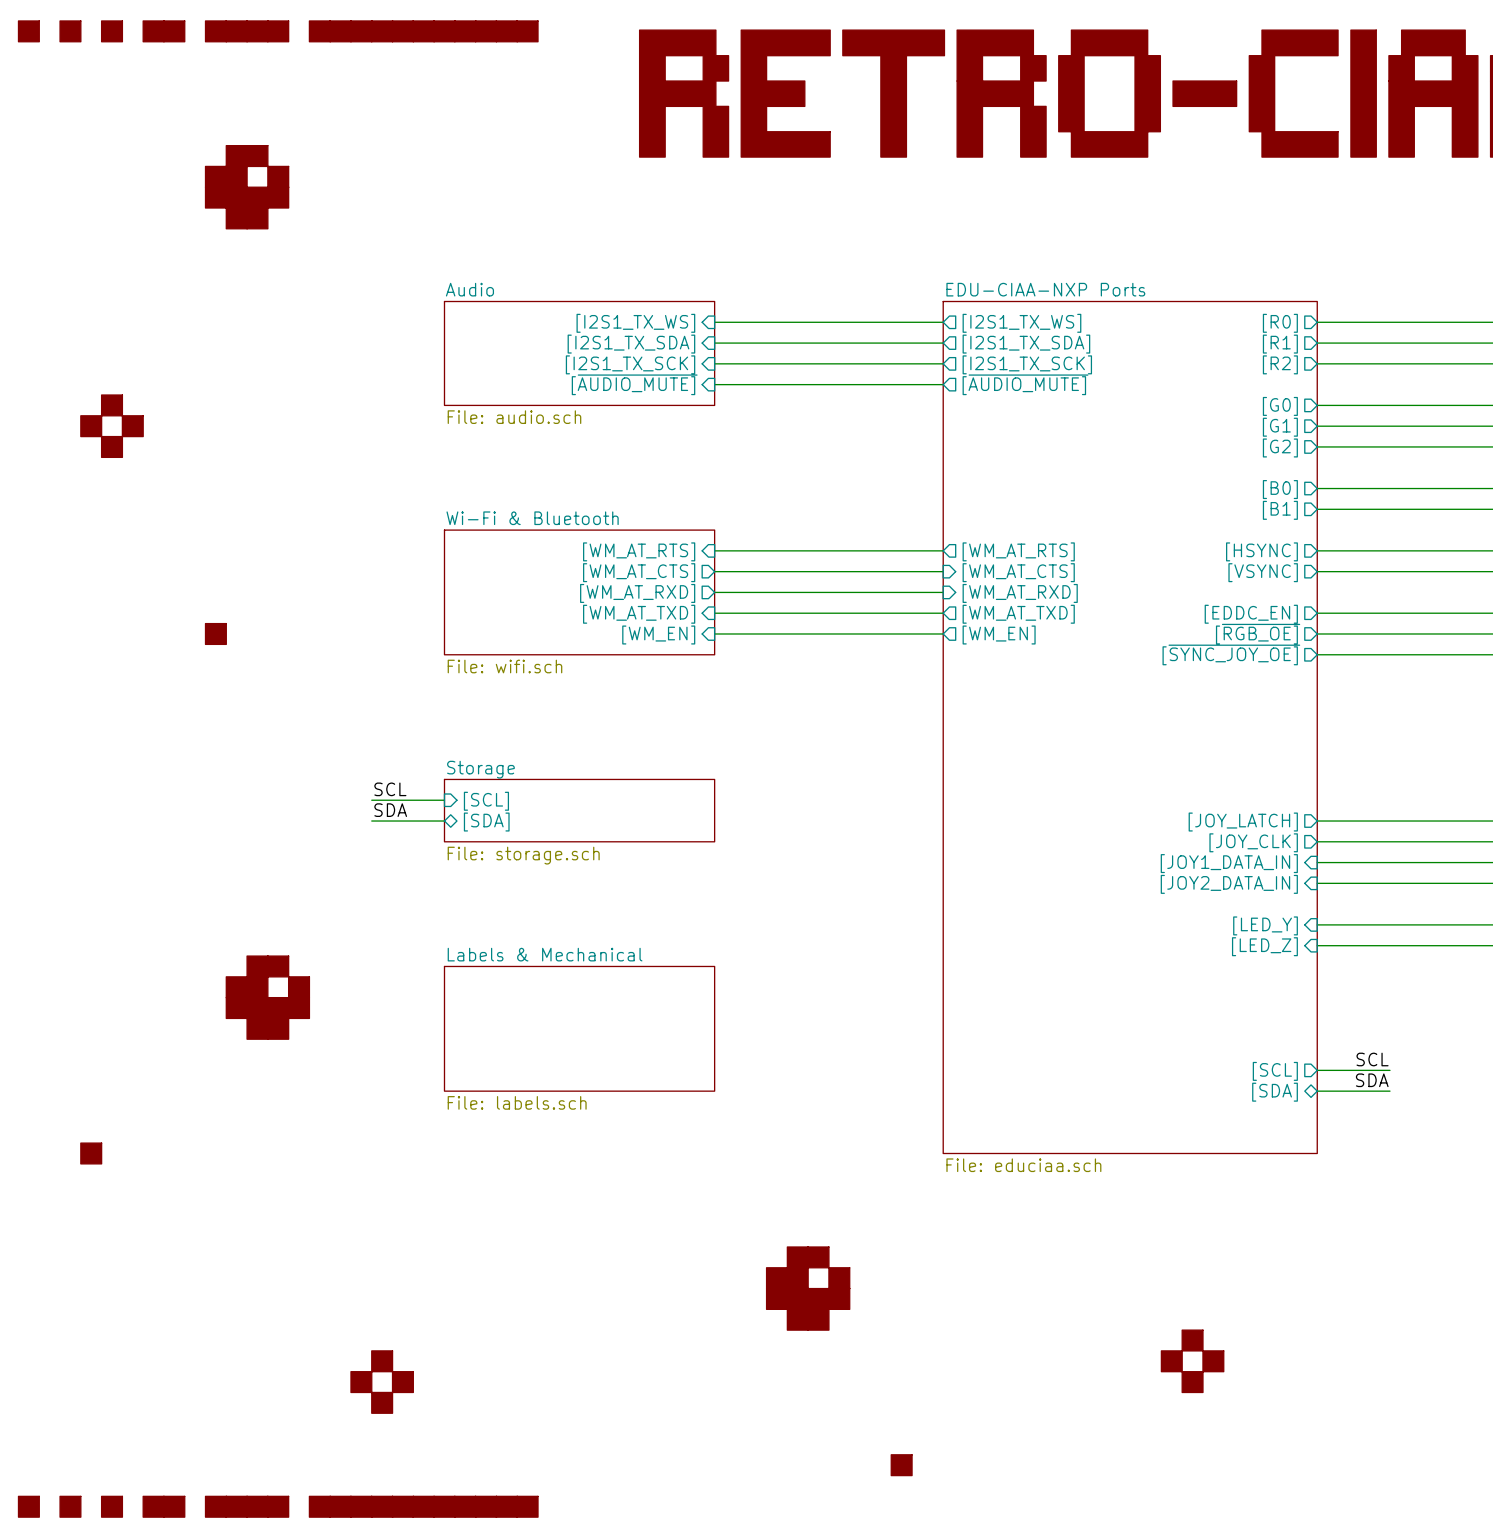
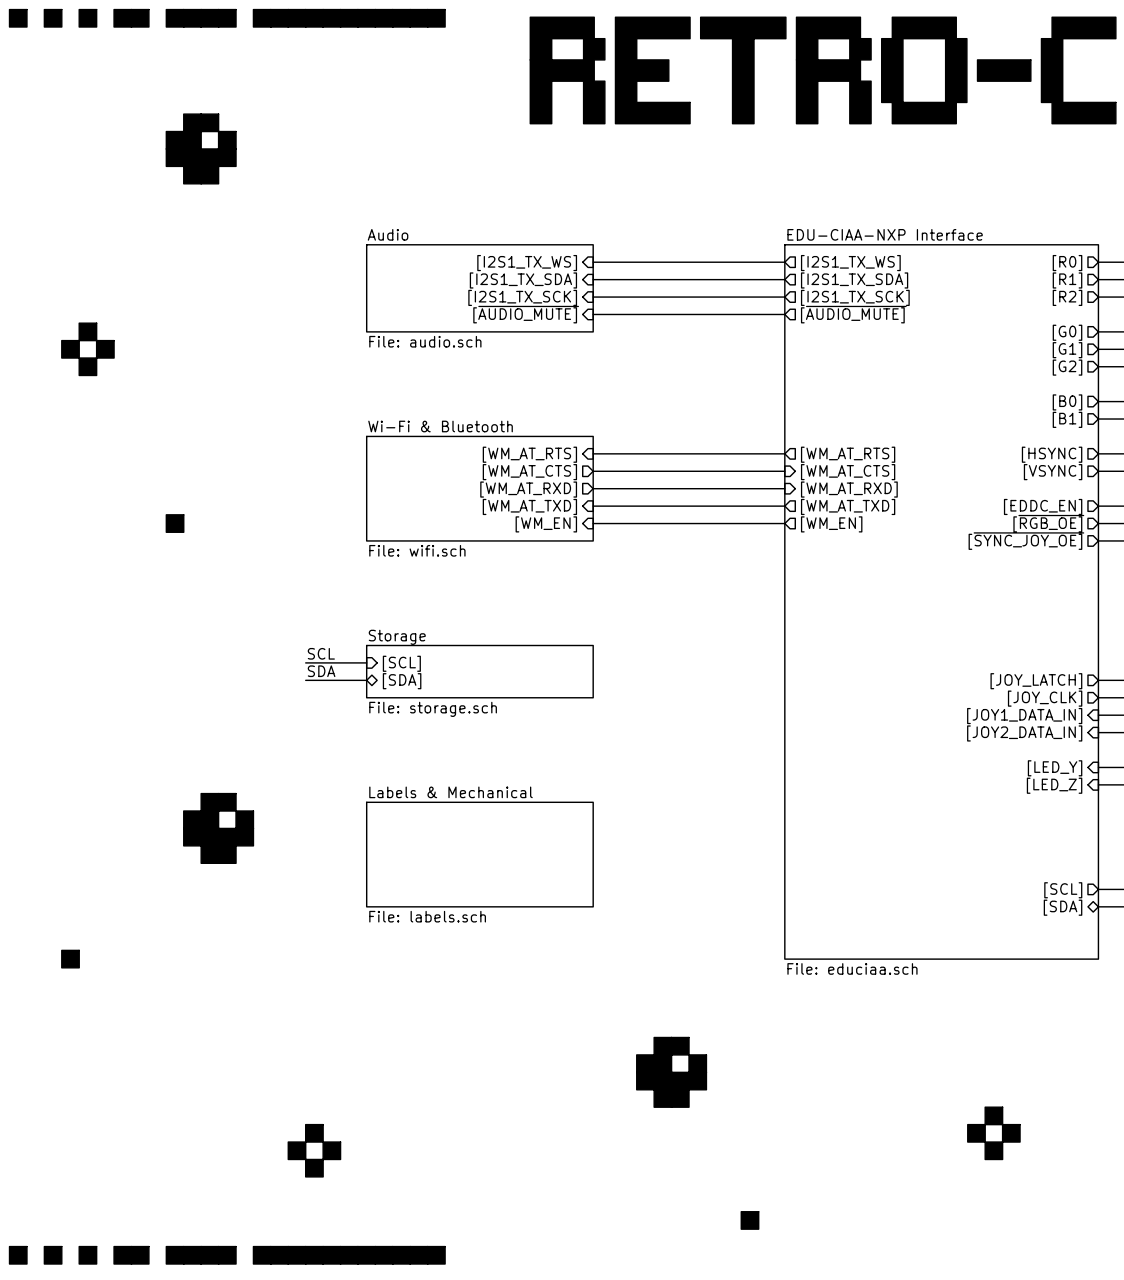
sheet EDU-CIAA-NXP Ports name: EDU-CIAA-NXP Ports (1045, 289) -> EDU-CIAA-NXP Interface (885, 234)

